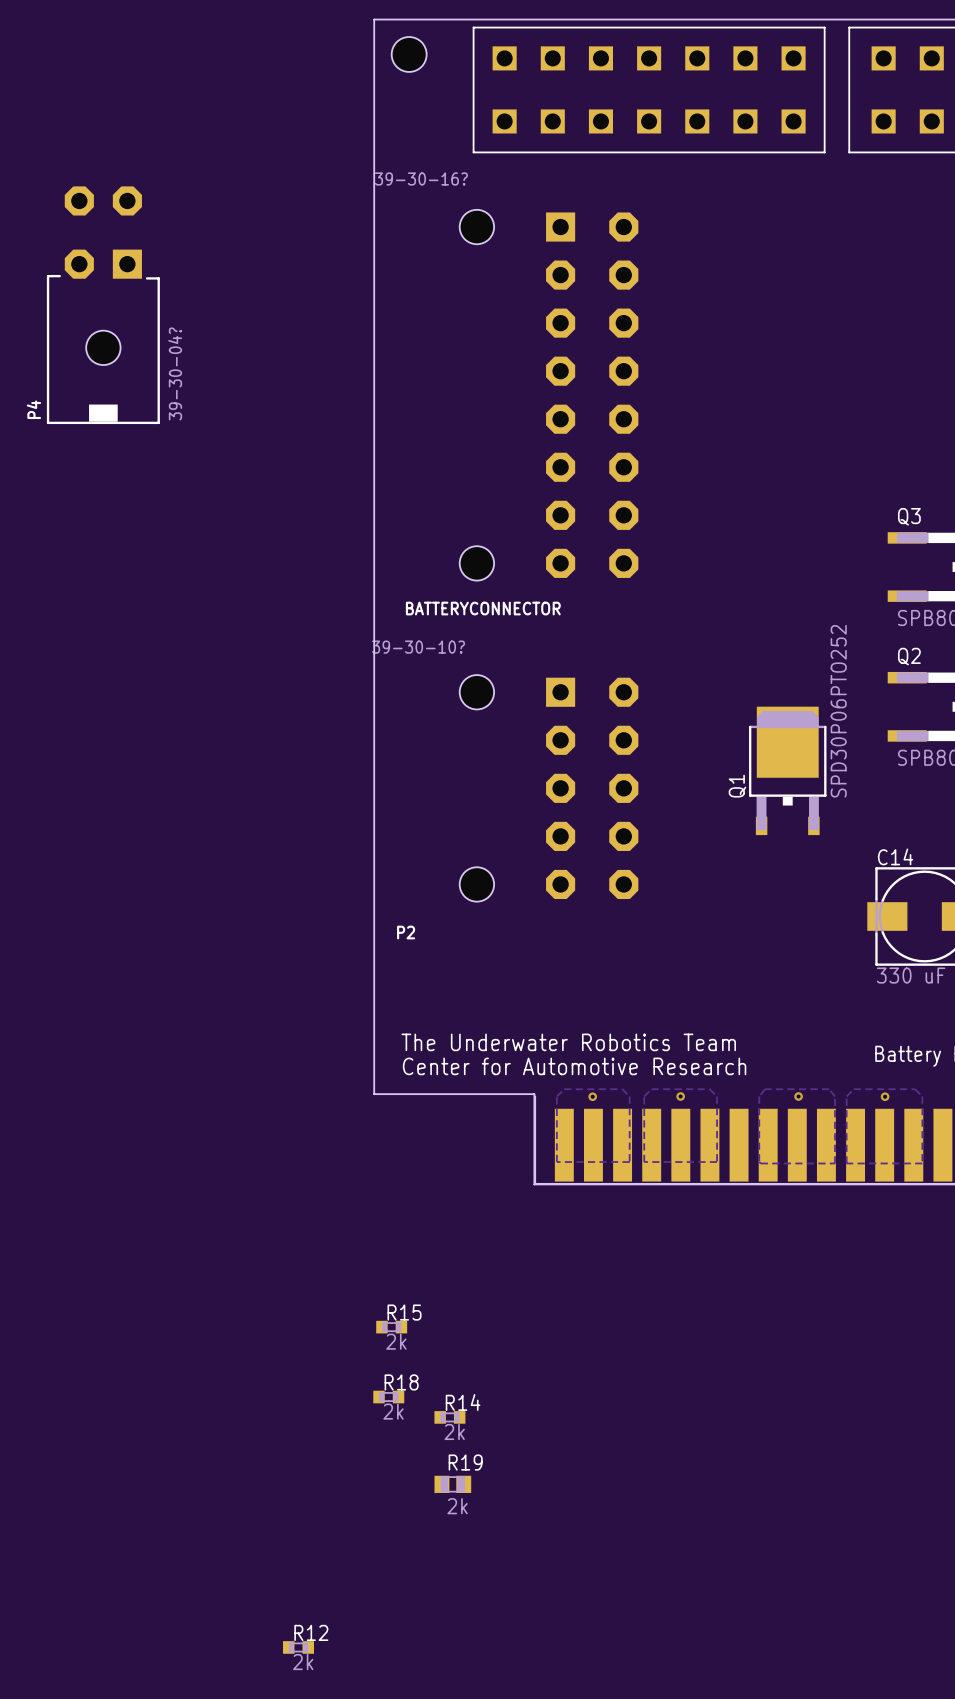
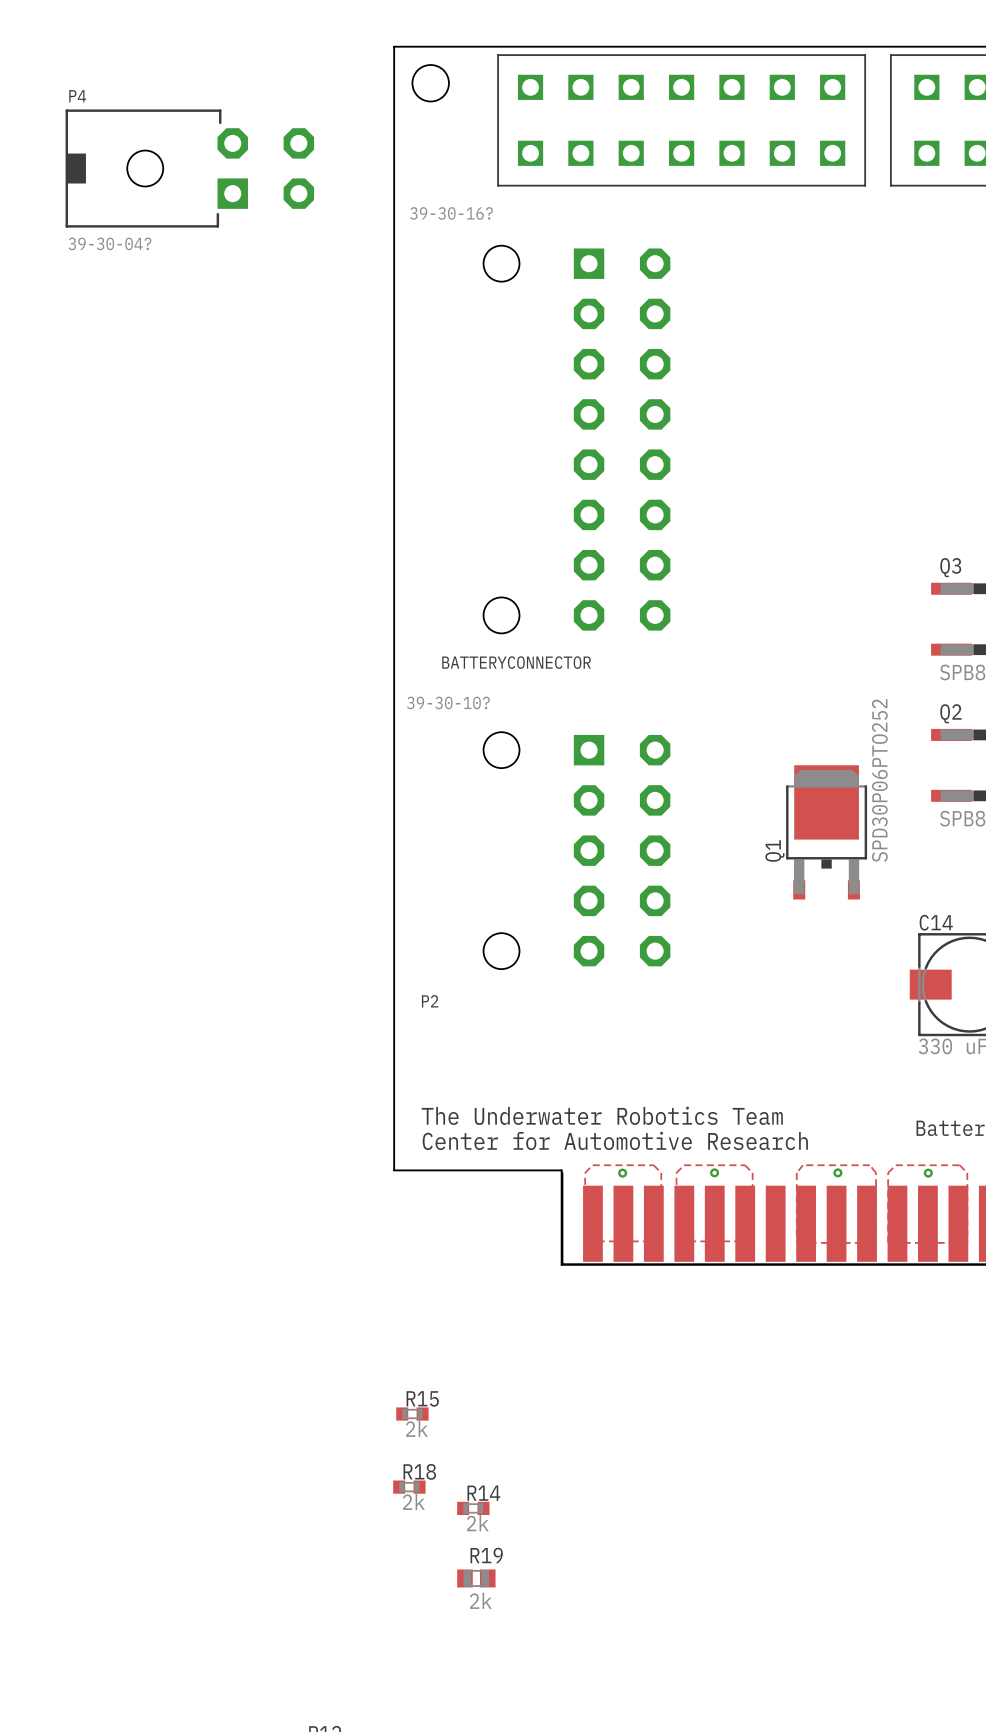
P4 rotation: 0° (103, 305) -> 90° clockwise (189, 168)
P4 position: (103, 305) -> (189, 168)

